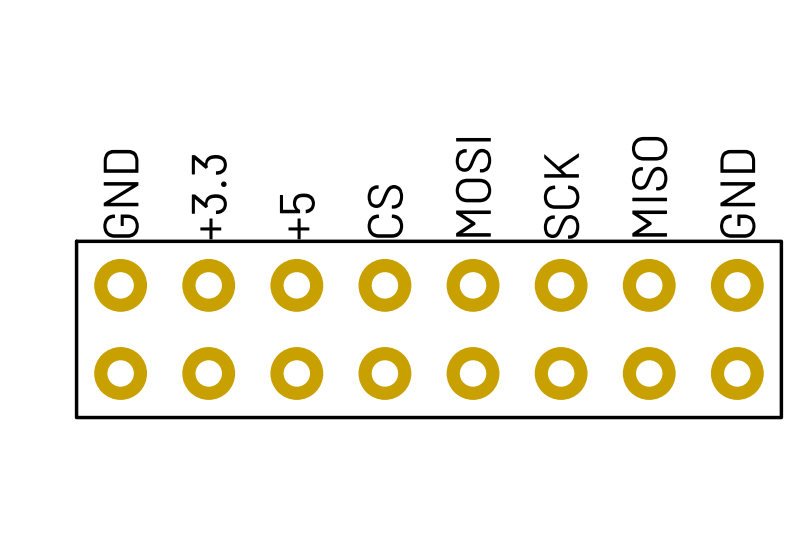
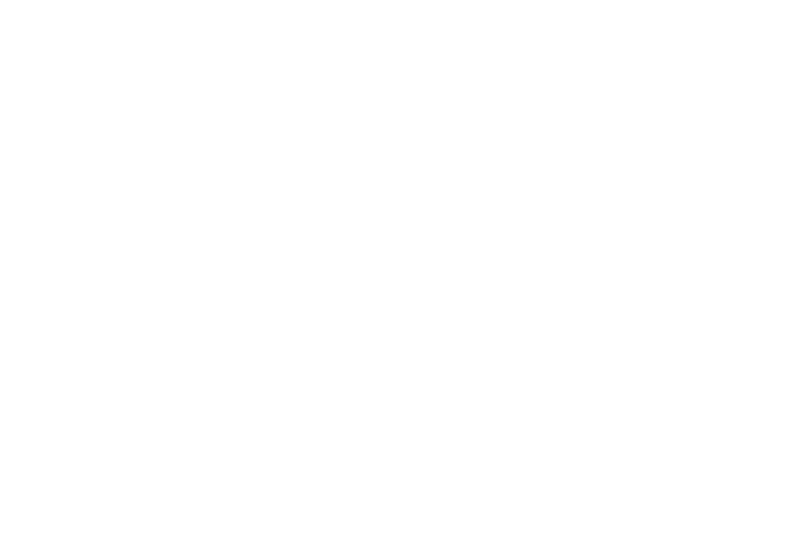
part: (428, 329) -> none

